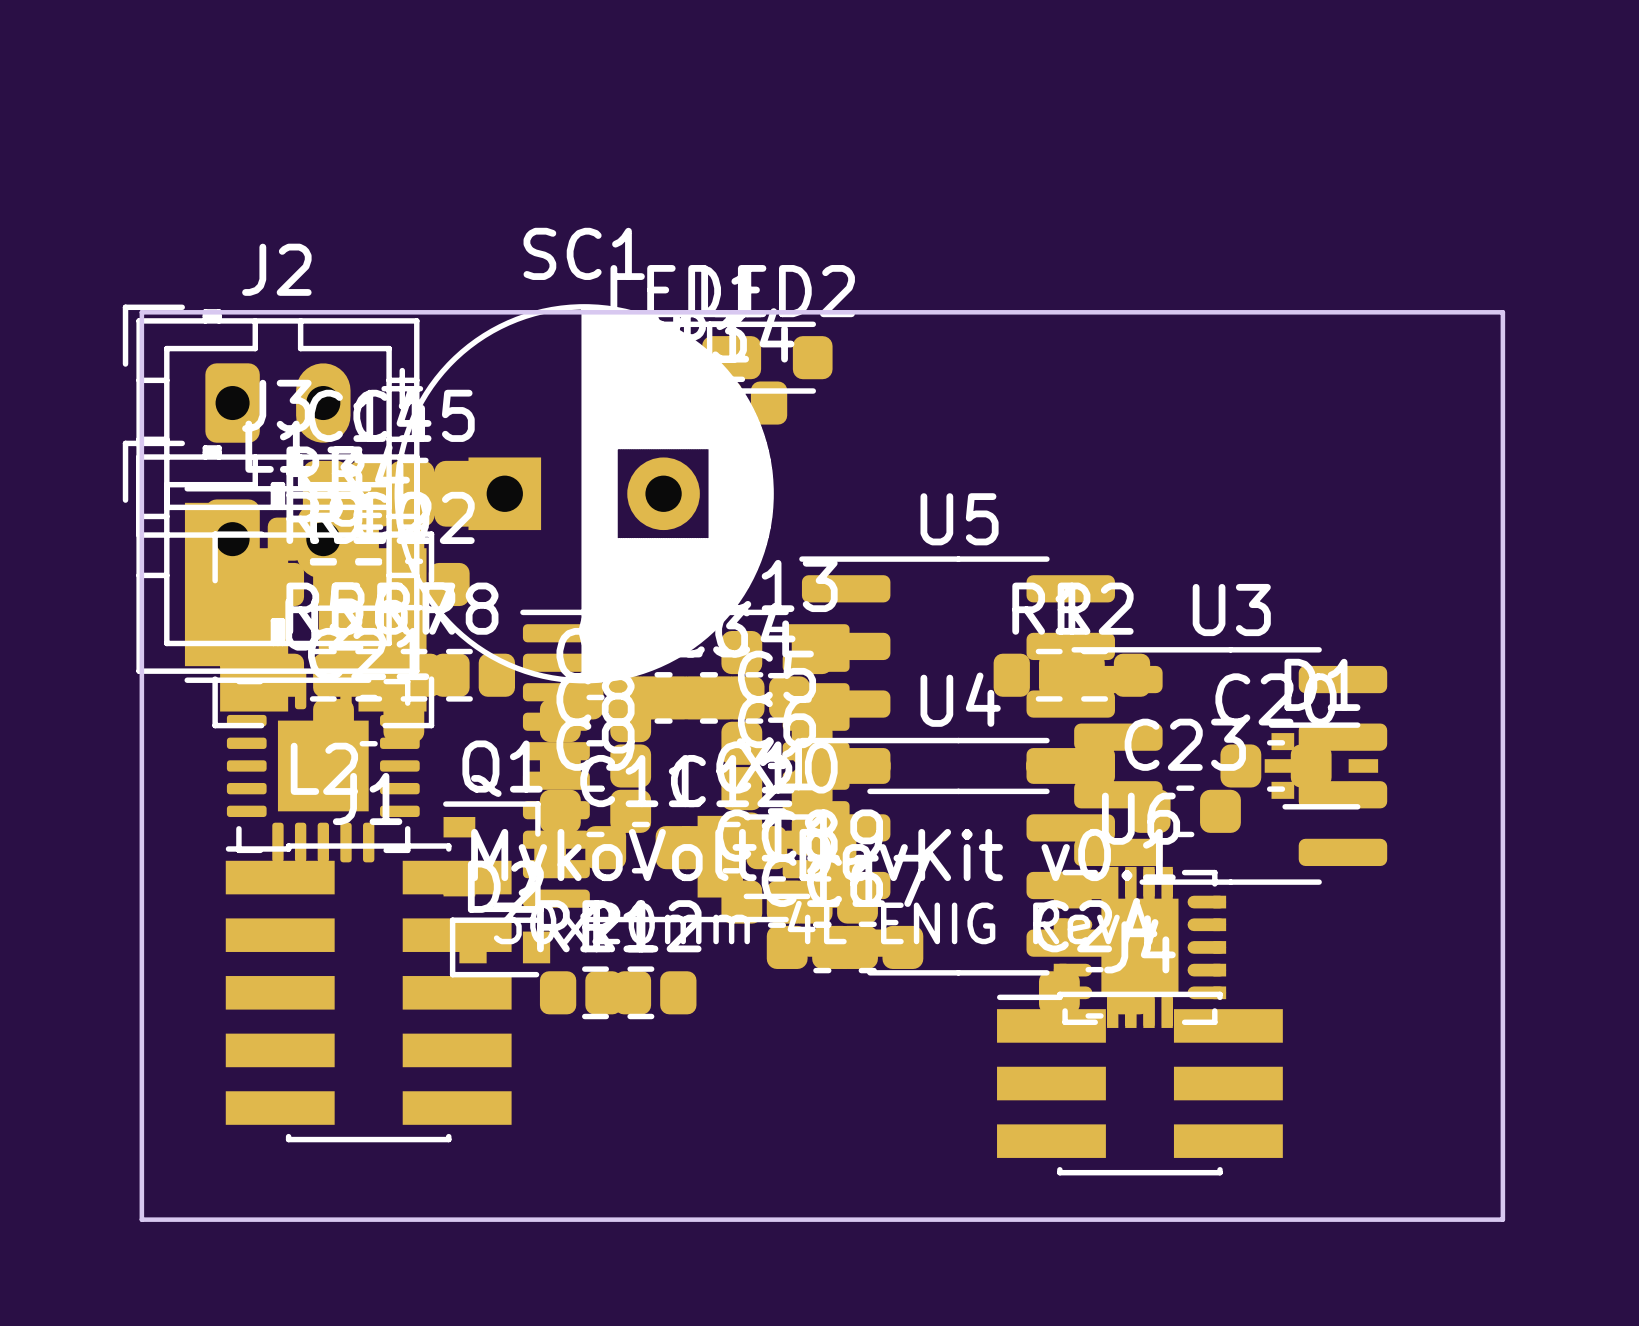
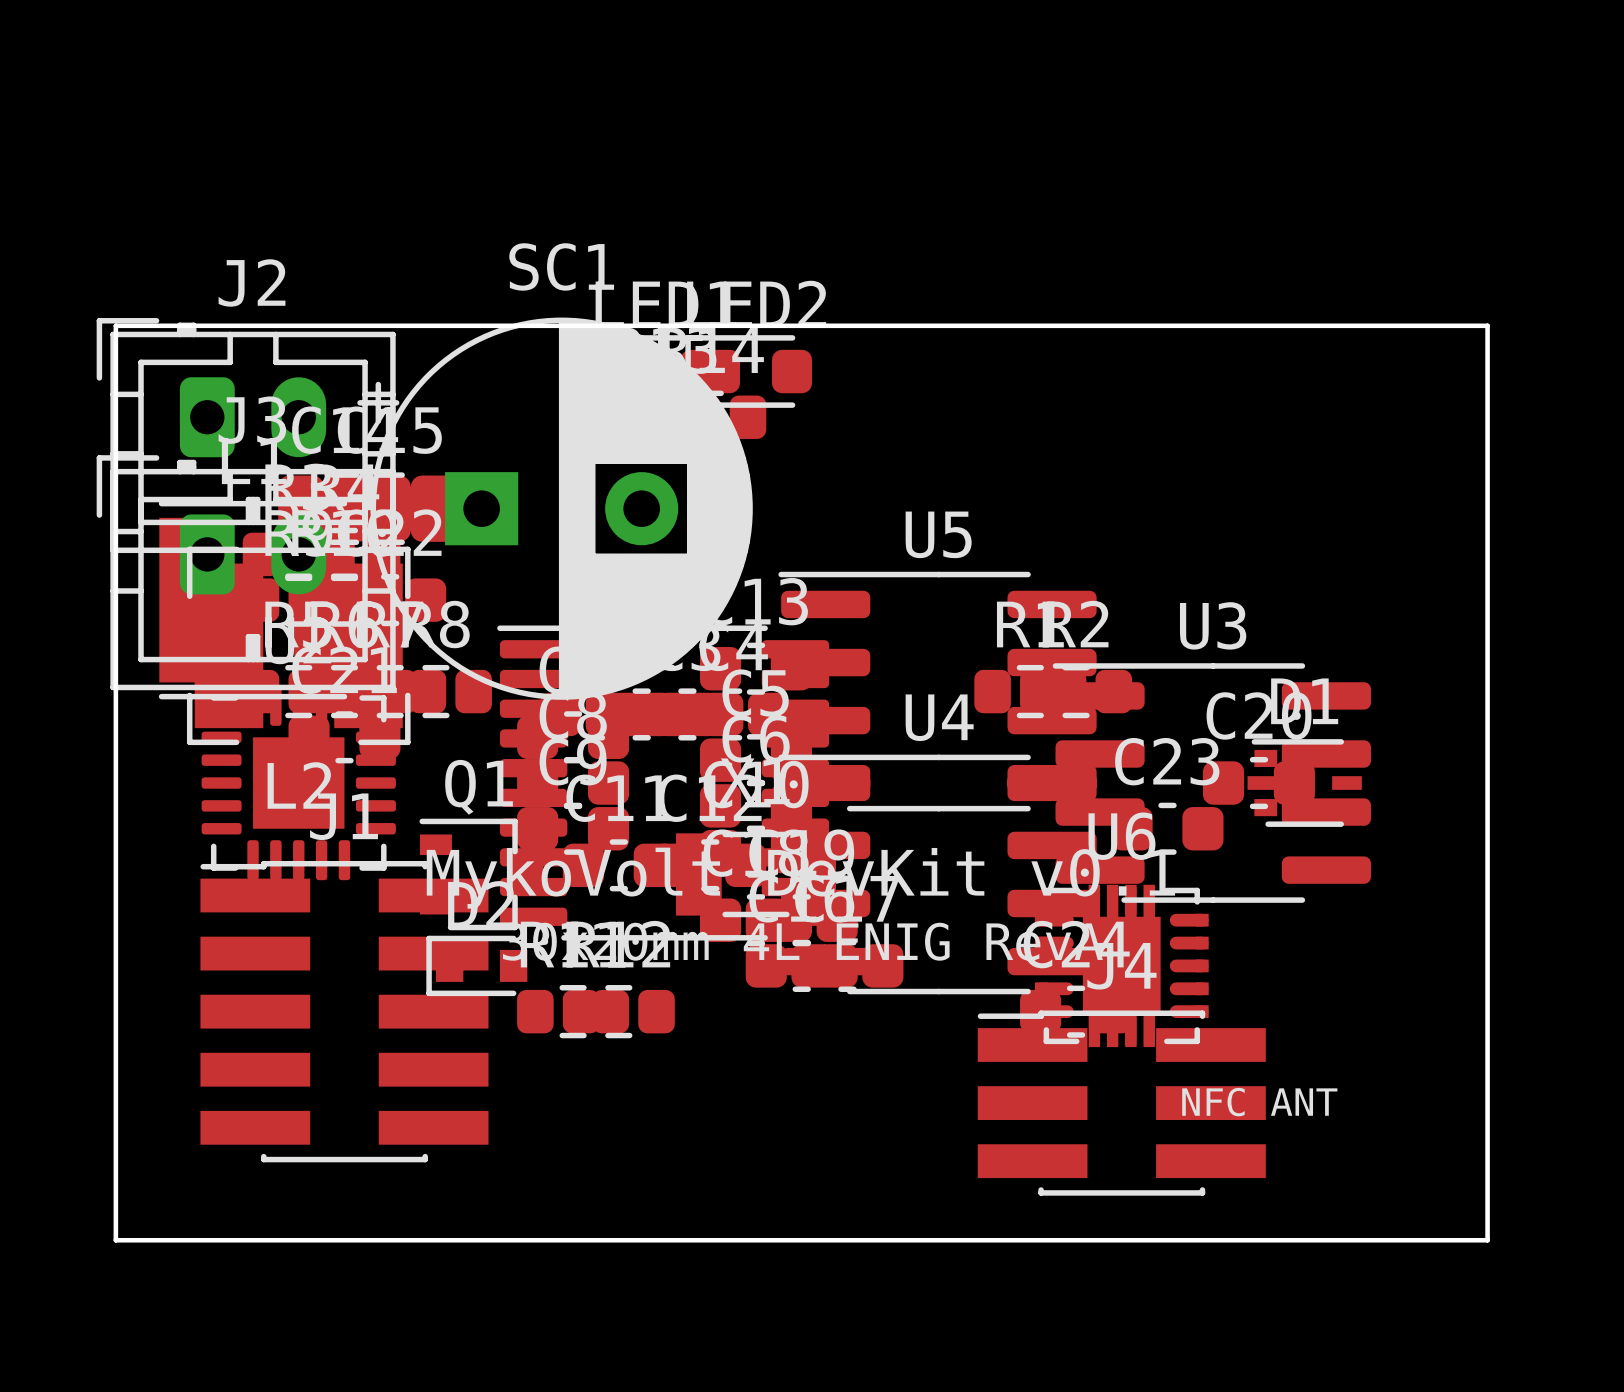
text: none -> NFC ANT (1259, 1102)

